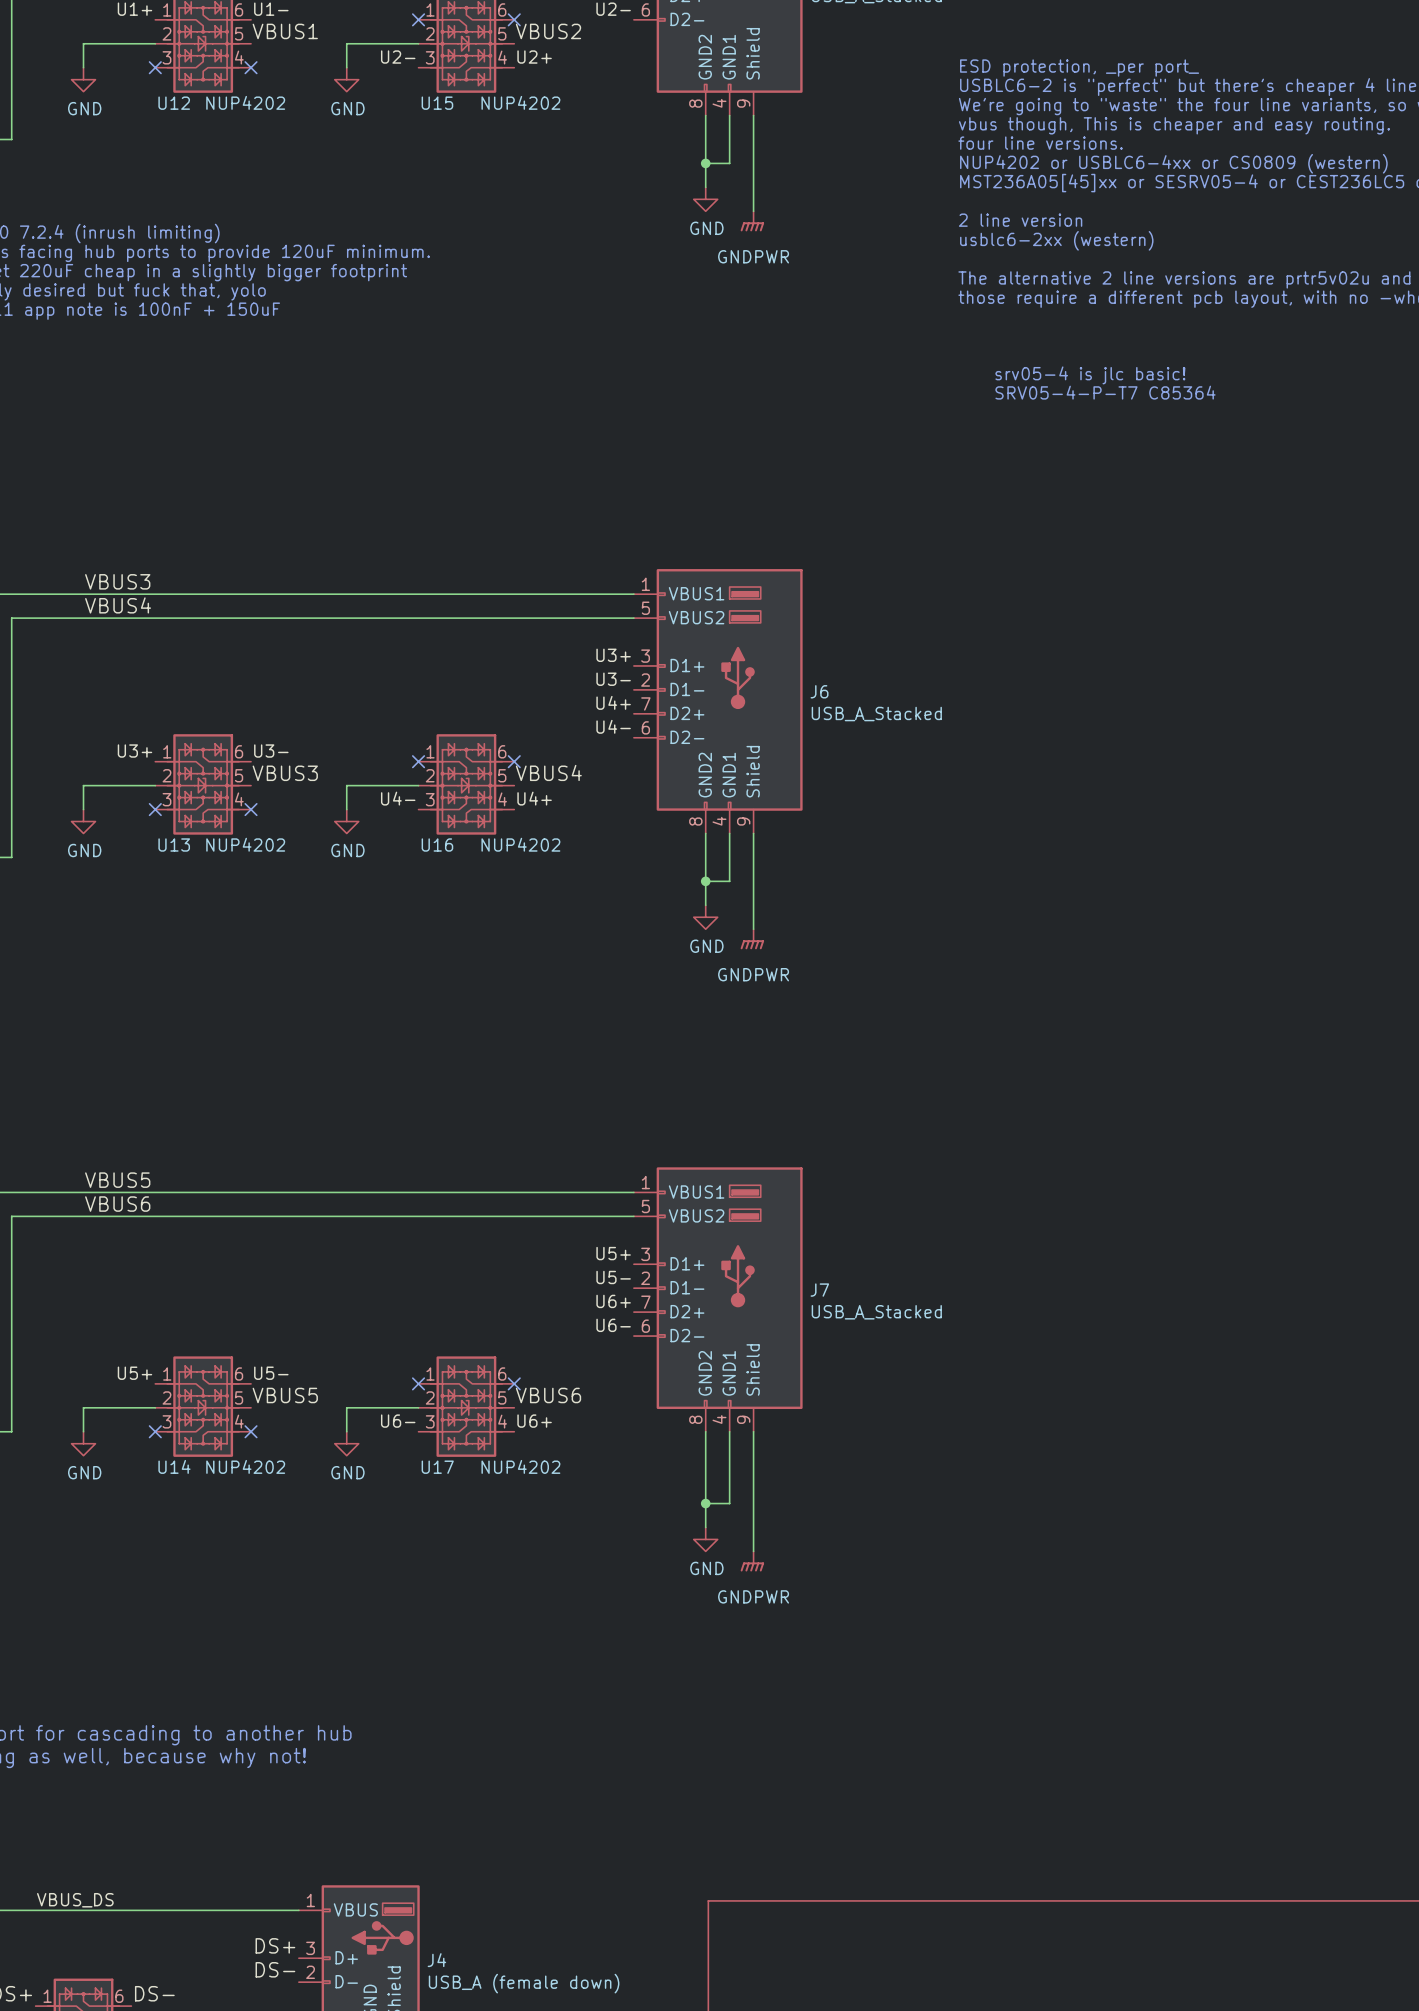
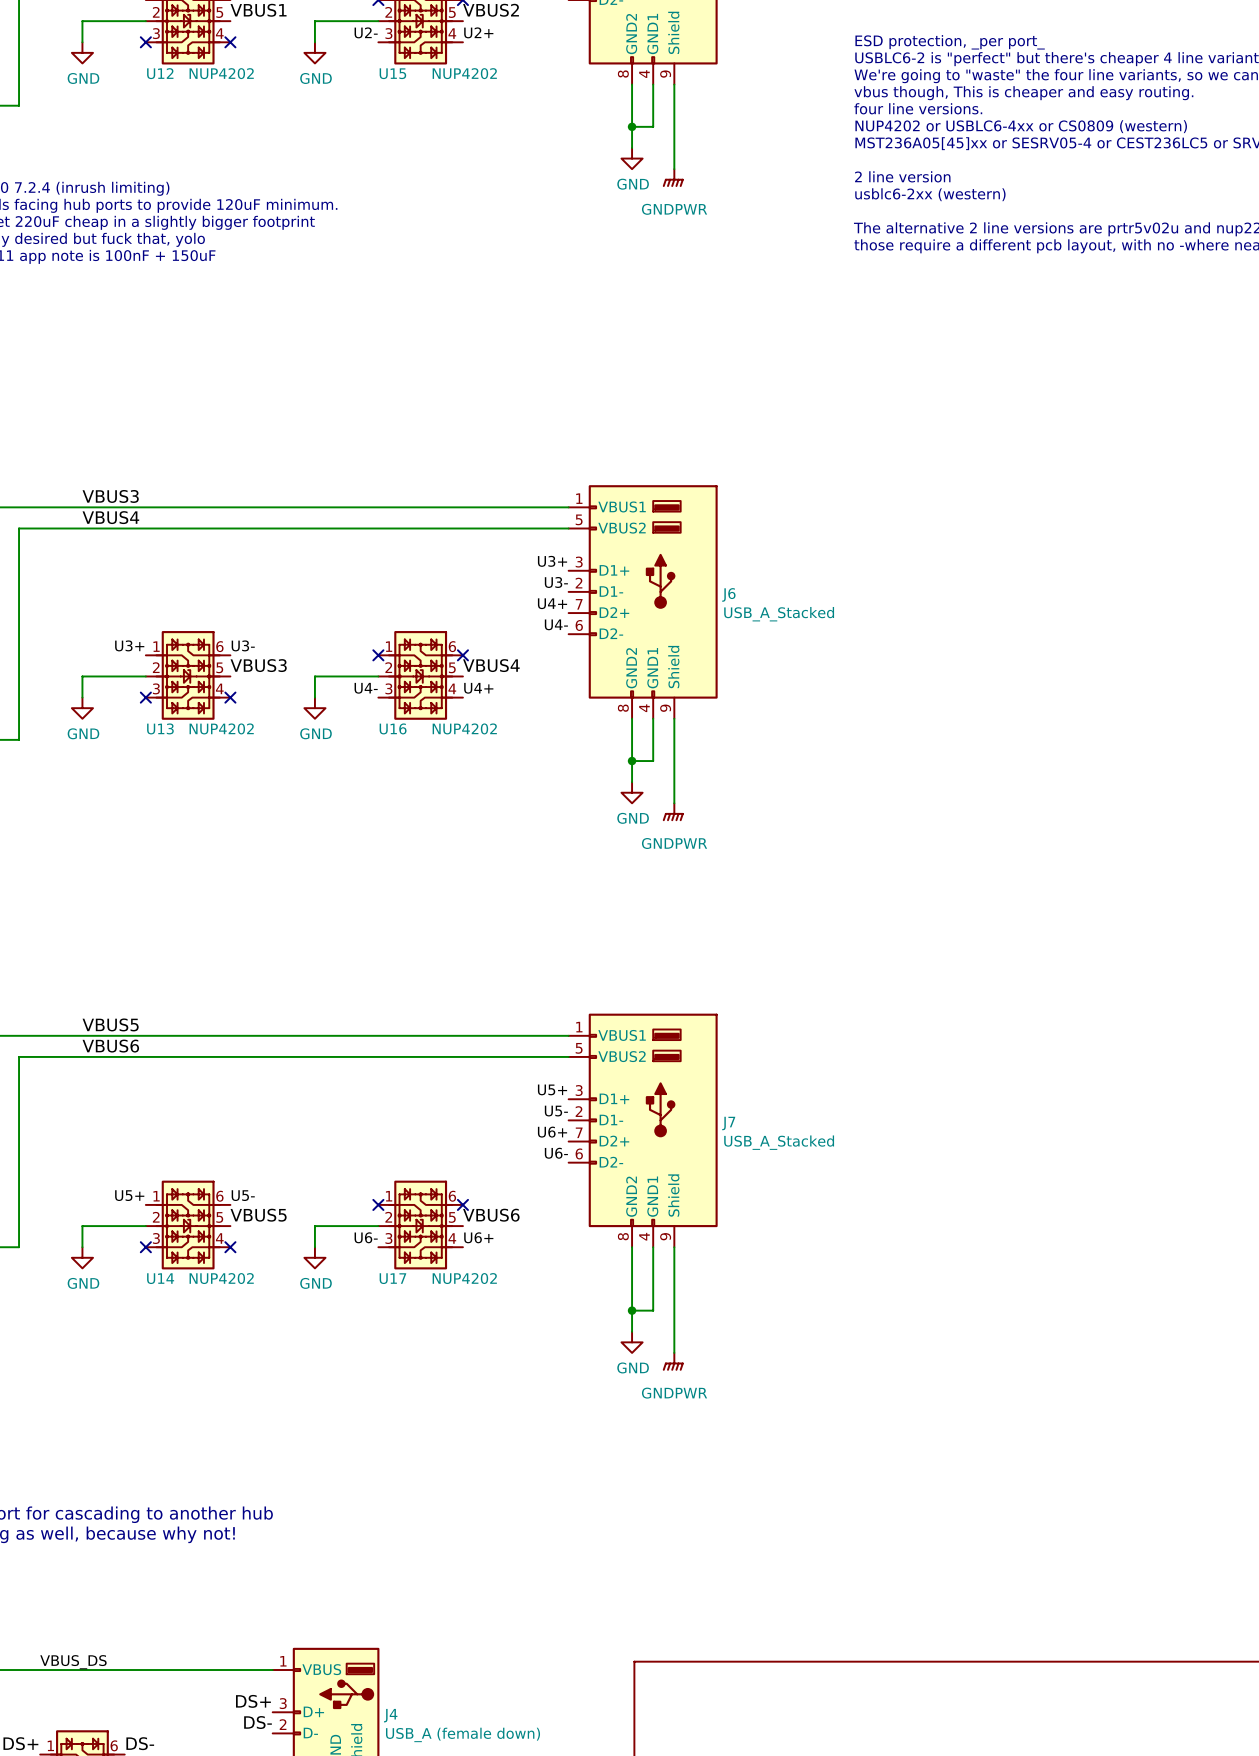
text: srv05-4 is jlc basic! (1090, 375) -> none
text: SRV05-4-P-T7 C85364 (1105, 392) -> none

